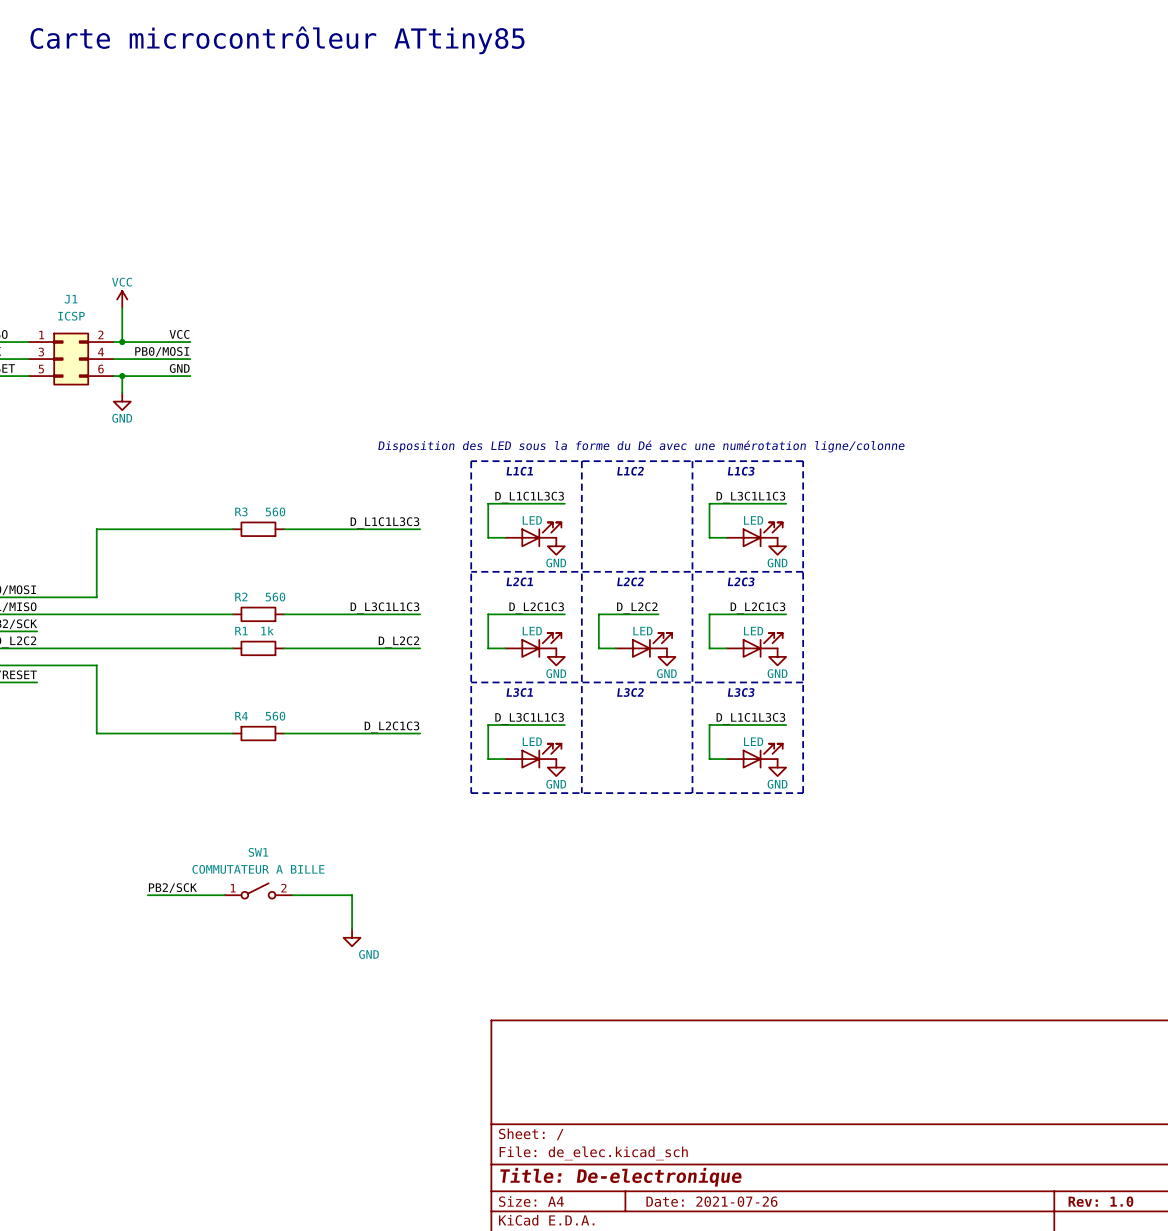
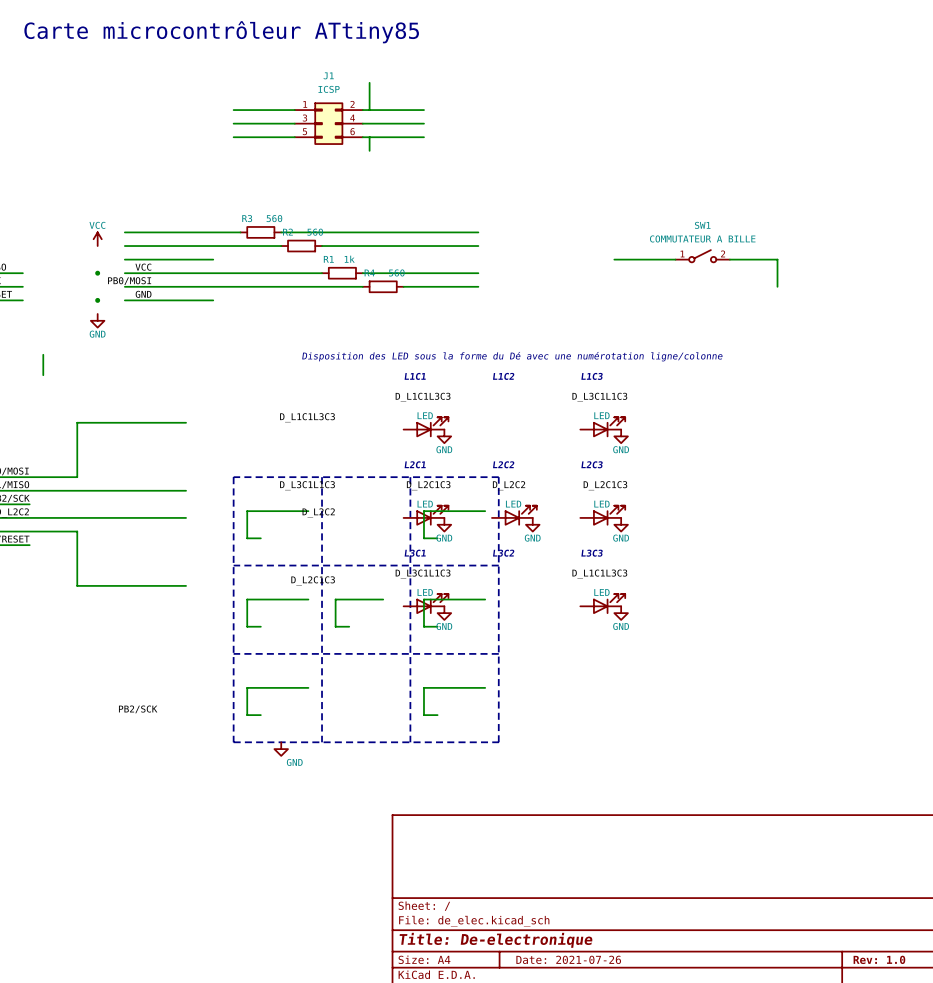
wire: none -> (369, 82) (369, 110)
wire: none -> (233, 110) (294, 110)
wire: none -> (362, 110) (423, 110)
wire: none -> (233, 123) (294, 123)
wire: none -> (362, 123) (423, 123)
wire: none -> (233, 137) (294, 137)
wire: none -> (362, 137) (423, 137)
wire: none -> (369, 137) (369, 150)
wire: none -> (124, 232) (240, 232)
wire: none -> (281, 232) (478, 232)
wire: (122, 307) (122, 342) -> none
wire: none -> (124, 246) (281, 246)
wire: none -> (322, 246) (478, 246)
wire: none -> (124, 259) (213, 259)
wire: none -> (614, 259) (675, 259)
wire: none -> (729, 259) (777, 259) (777, 286)
wire: (113, 342) (156, 342) -> none
wire: none -> (152, 273) (322, 273)
wire: none -> (362, 273) (478, 273)
J1 position: (71, 359) -> (328, 123)
wire: (113, 359) (156, 359) -> none
wire: none -> (152, 286) (362, 286)
wire: none -> (403, 286) (478, 286)
wire: (113, 376) (156, 376) -> none
wire: (122, 376) (122, 393) -> none
wire: none -> (152, 300) (213, 300)
wire: none -> (43, 354) (43, 375)
line: (471, 461) (471, 793) (803, 793) (803, 461) (471, 461) -> none
line: (581, 461) (581, 793) -> (410, 477) (410, 742)
line: (692, 461) (692, 793) -> none
wire: (564, 503) (488, 503) (488, 537) (505, 537) -> (485, 511) (423, 511) (423, 538) (437, 538)
wire: (786, 503) (709, 503) (709, 537) (726, 537) -> none
R3 position: (258, 529) -> (260, 232)
wire: (283, 529) (420, 529) -> none
line: (471, 571) (803, 571) -> none
line: none -> (233, 477) (233, 742) (498, 742) (498, 477) (233, 477)
line: none -> (322, 477) (322, 742)
R2 position: (258, 614) -> (301, 246)
wire: (283, 614) (420, 614) -> none
wire: (564, 614) (488, 614) (488, 648) (505, 648) -> (485, 599) (423, 599) (423, 626) (437, 626)
wire: (658, 614) (598, 614) (598, 648) (615, 648) -> none
wire: (786, 614) (709, 614) (709, 648) (726, 648) -> none
wire: none -> (308, 511) (247, 511) (247, 538) (260, 538)
R1 position: (258, 648) -> (342, 273)
wire: (283, 648) (420, 648) -> none
line: (471, 682) (803, 682) -> none
line: none -> (233, 565) (498, 565)
wire: (564, 725) (488, 725) (488, 759) (505, 759) -> (485, 687) (423, 687) (423, 715) (437, 715)
wire: (786, 725) (709, 725) (709, 759) (726, 759) -> none
R4 position: (258, 733) -> (383, 286)
wire: (283, 733) (420, 733) -> none
wire: none -> (308, 599) (247, 599) (247, 626) (260, 626)
wire: none -> (383, 599) (335, 599) (335, 626) (349, 626)
line: none -> (233, 653) (498, 653)
SW1 position: (258, 890) -> (702, 256)
wire: (147, 895) (224, 895) -> none
wire: (292, 895) (309, 895) -> (308, 687) (247, 687) (247, 715)
wire: (326, 895) (352, 895) (352, 929) -> none

